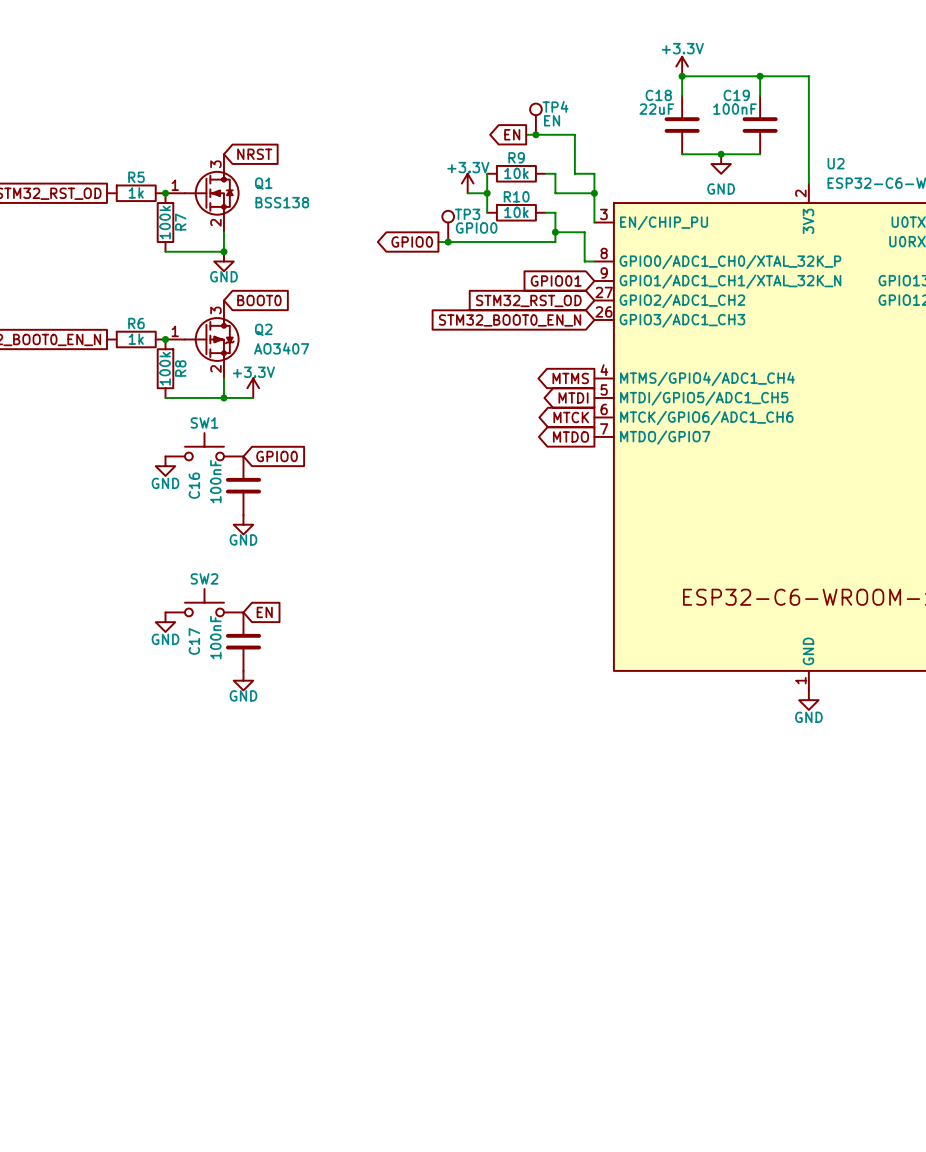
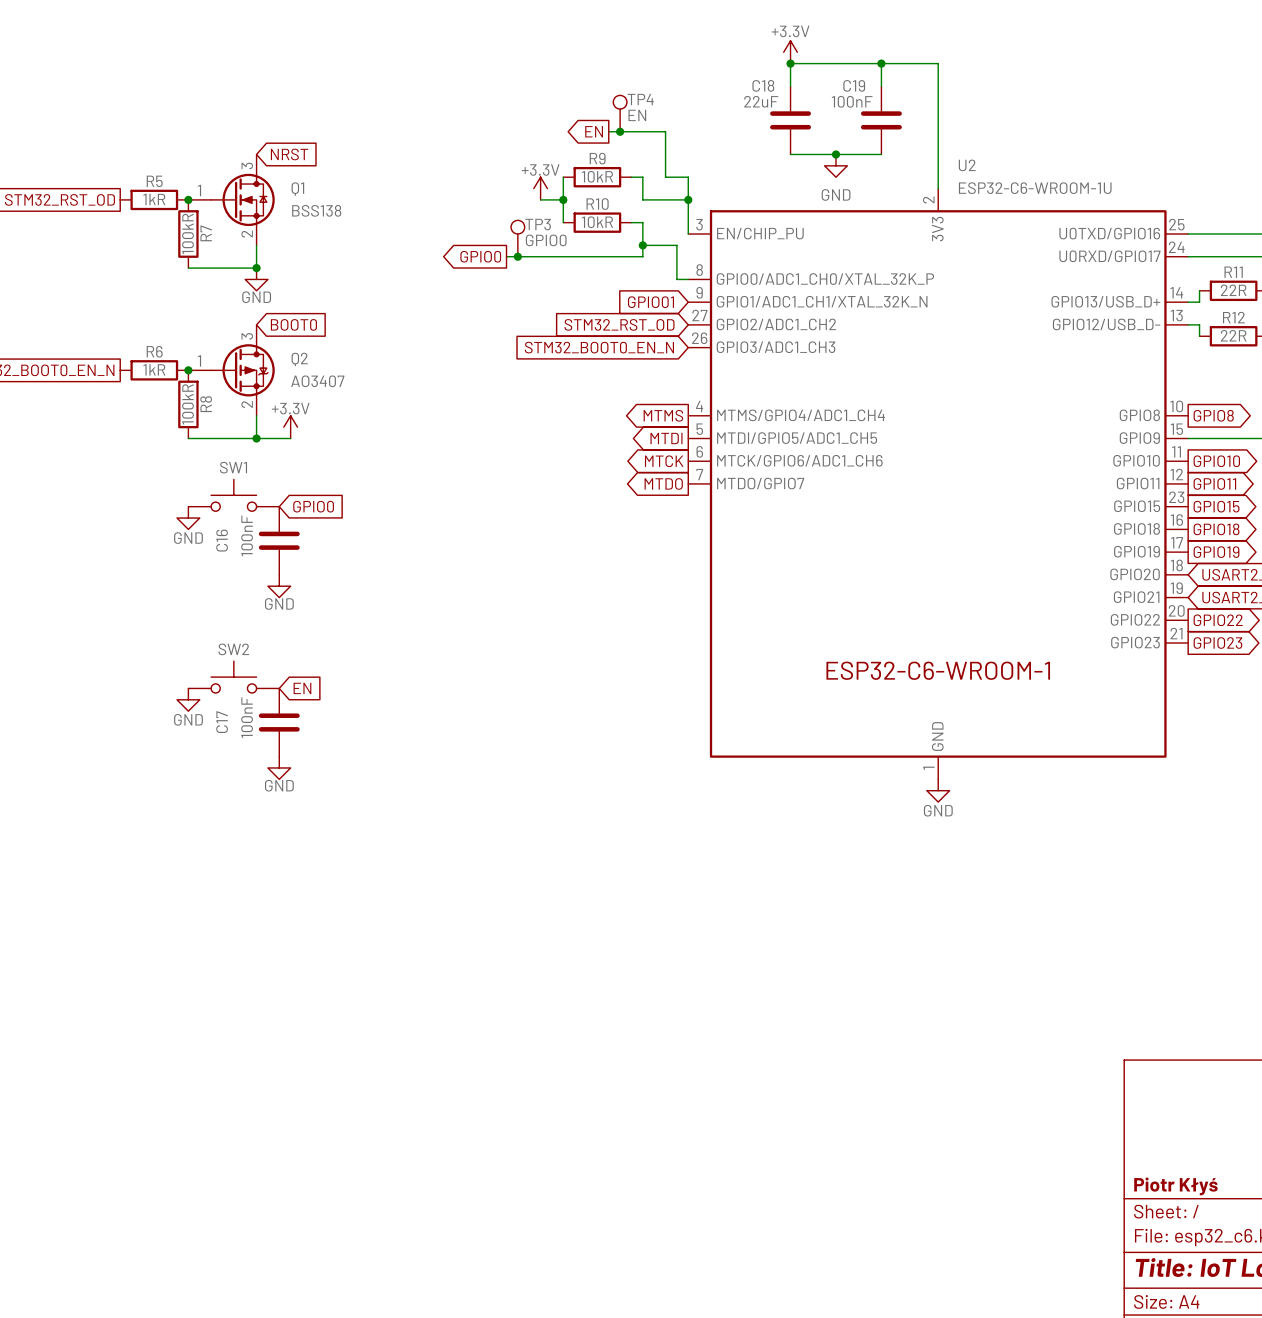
R9 value: 10k (516, 173) -> 10kR (597, 176)
R5 value: 1k (136, 192) -> 1kR (154, 199)
R10 value: 10k (516, 212) -> 10kR (597, 222)
R7 value: 100k (165, 222) -> 100kR (187, 233)
R6 value: 1k (136, 339) -> 1kR (154, 369)
R8 value: 100k (165, 368) -> 100kR (187, 404)

